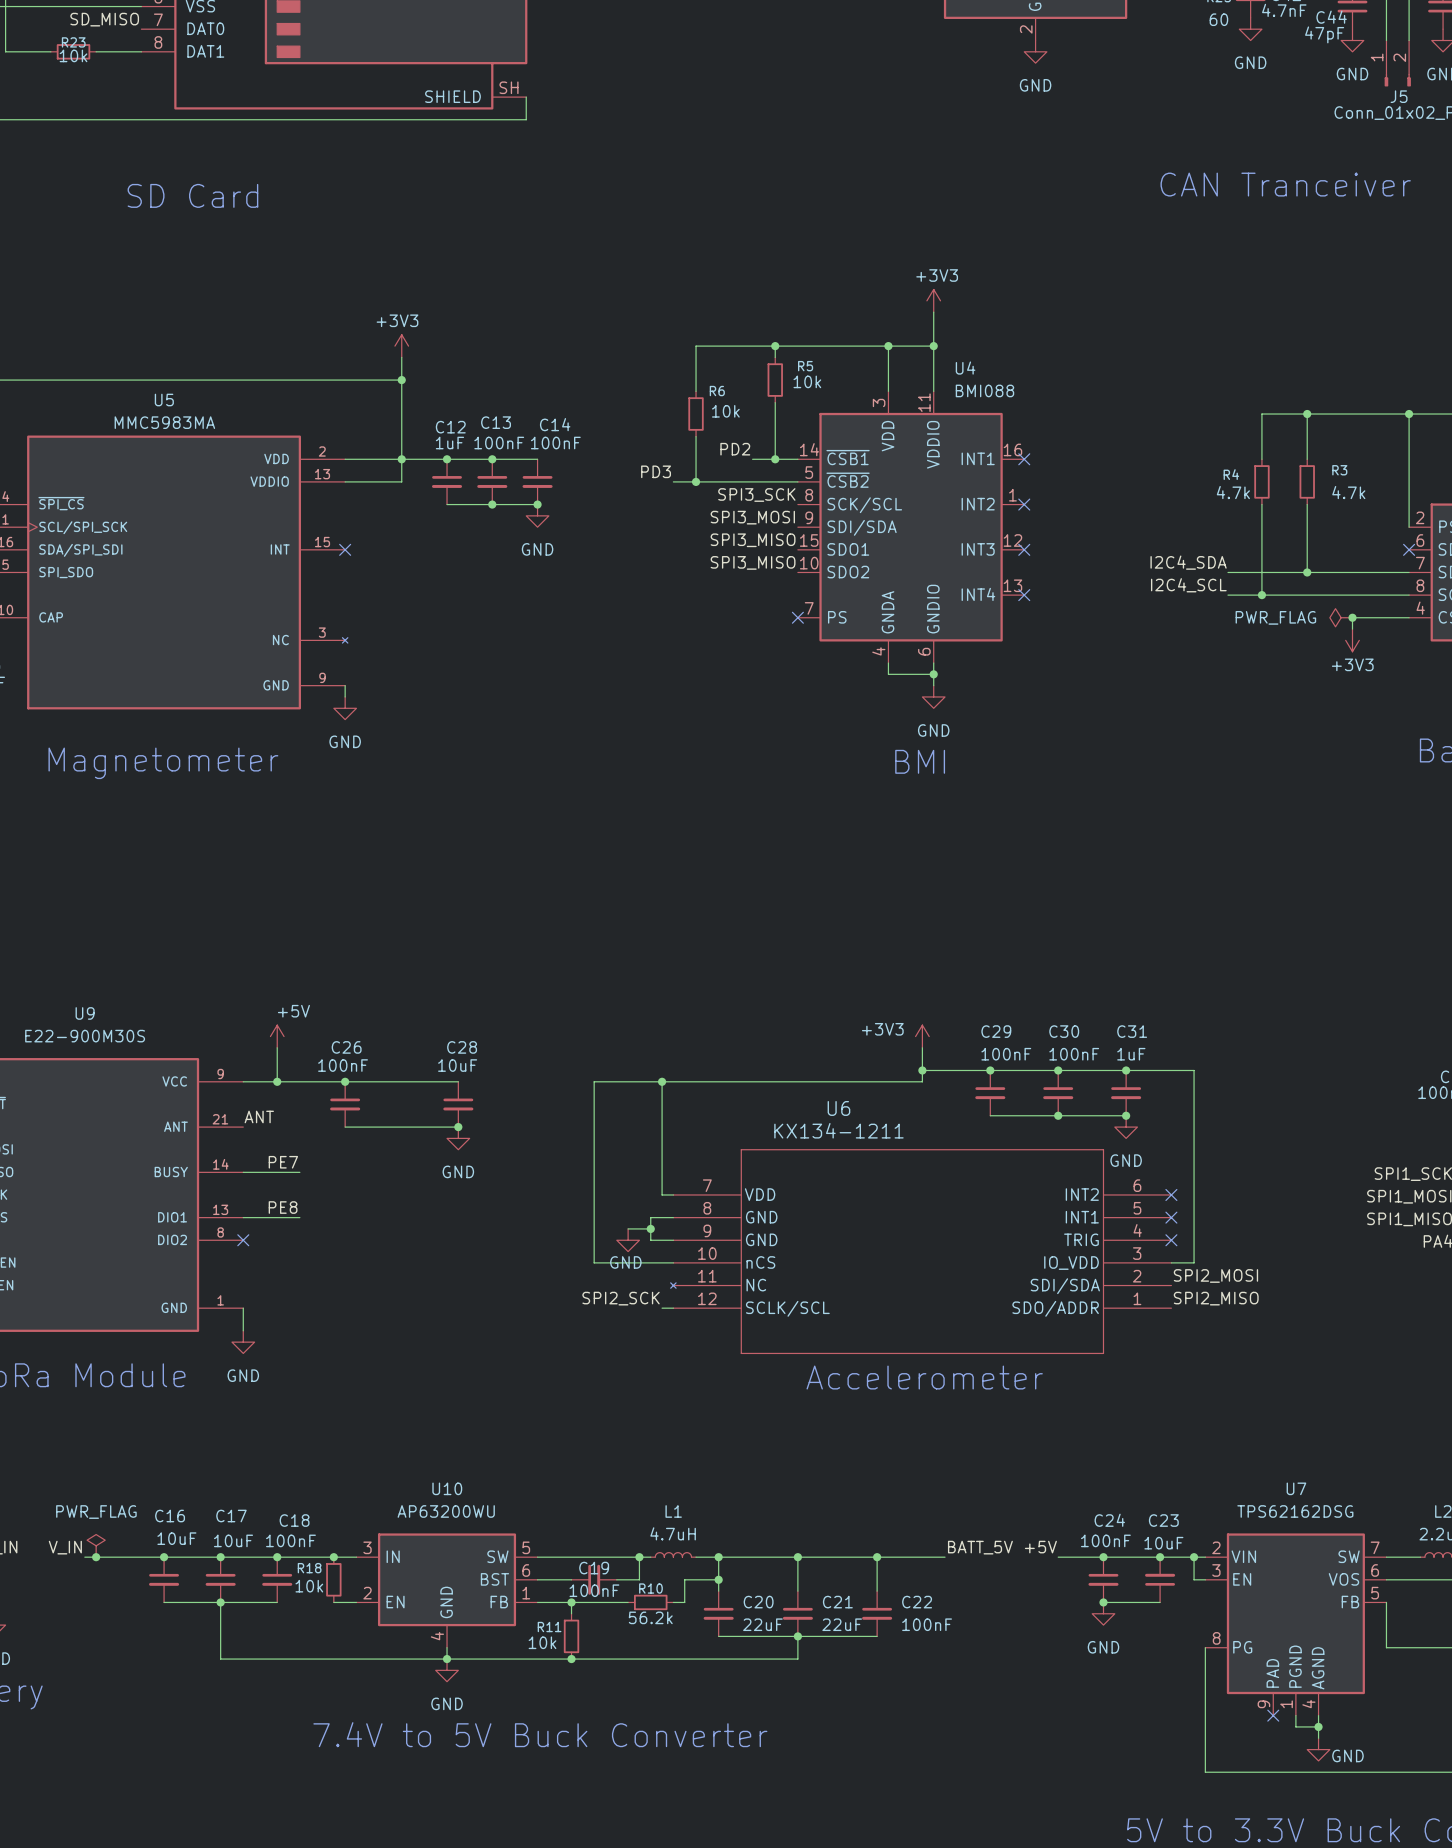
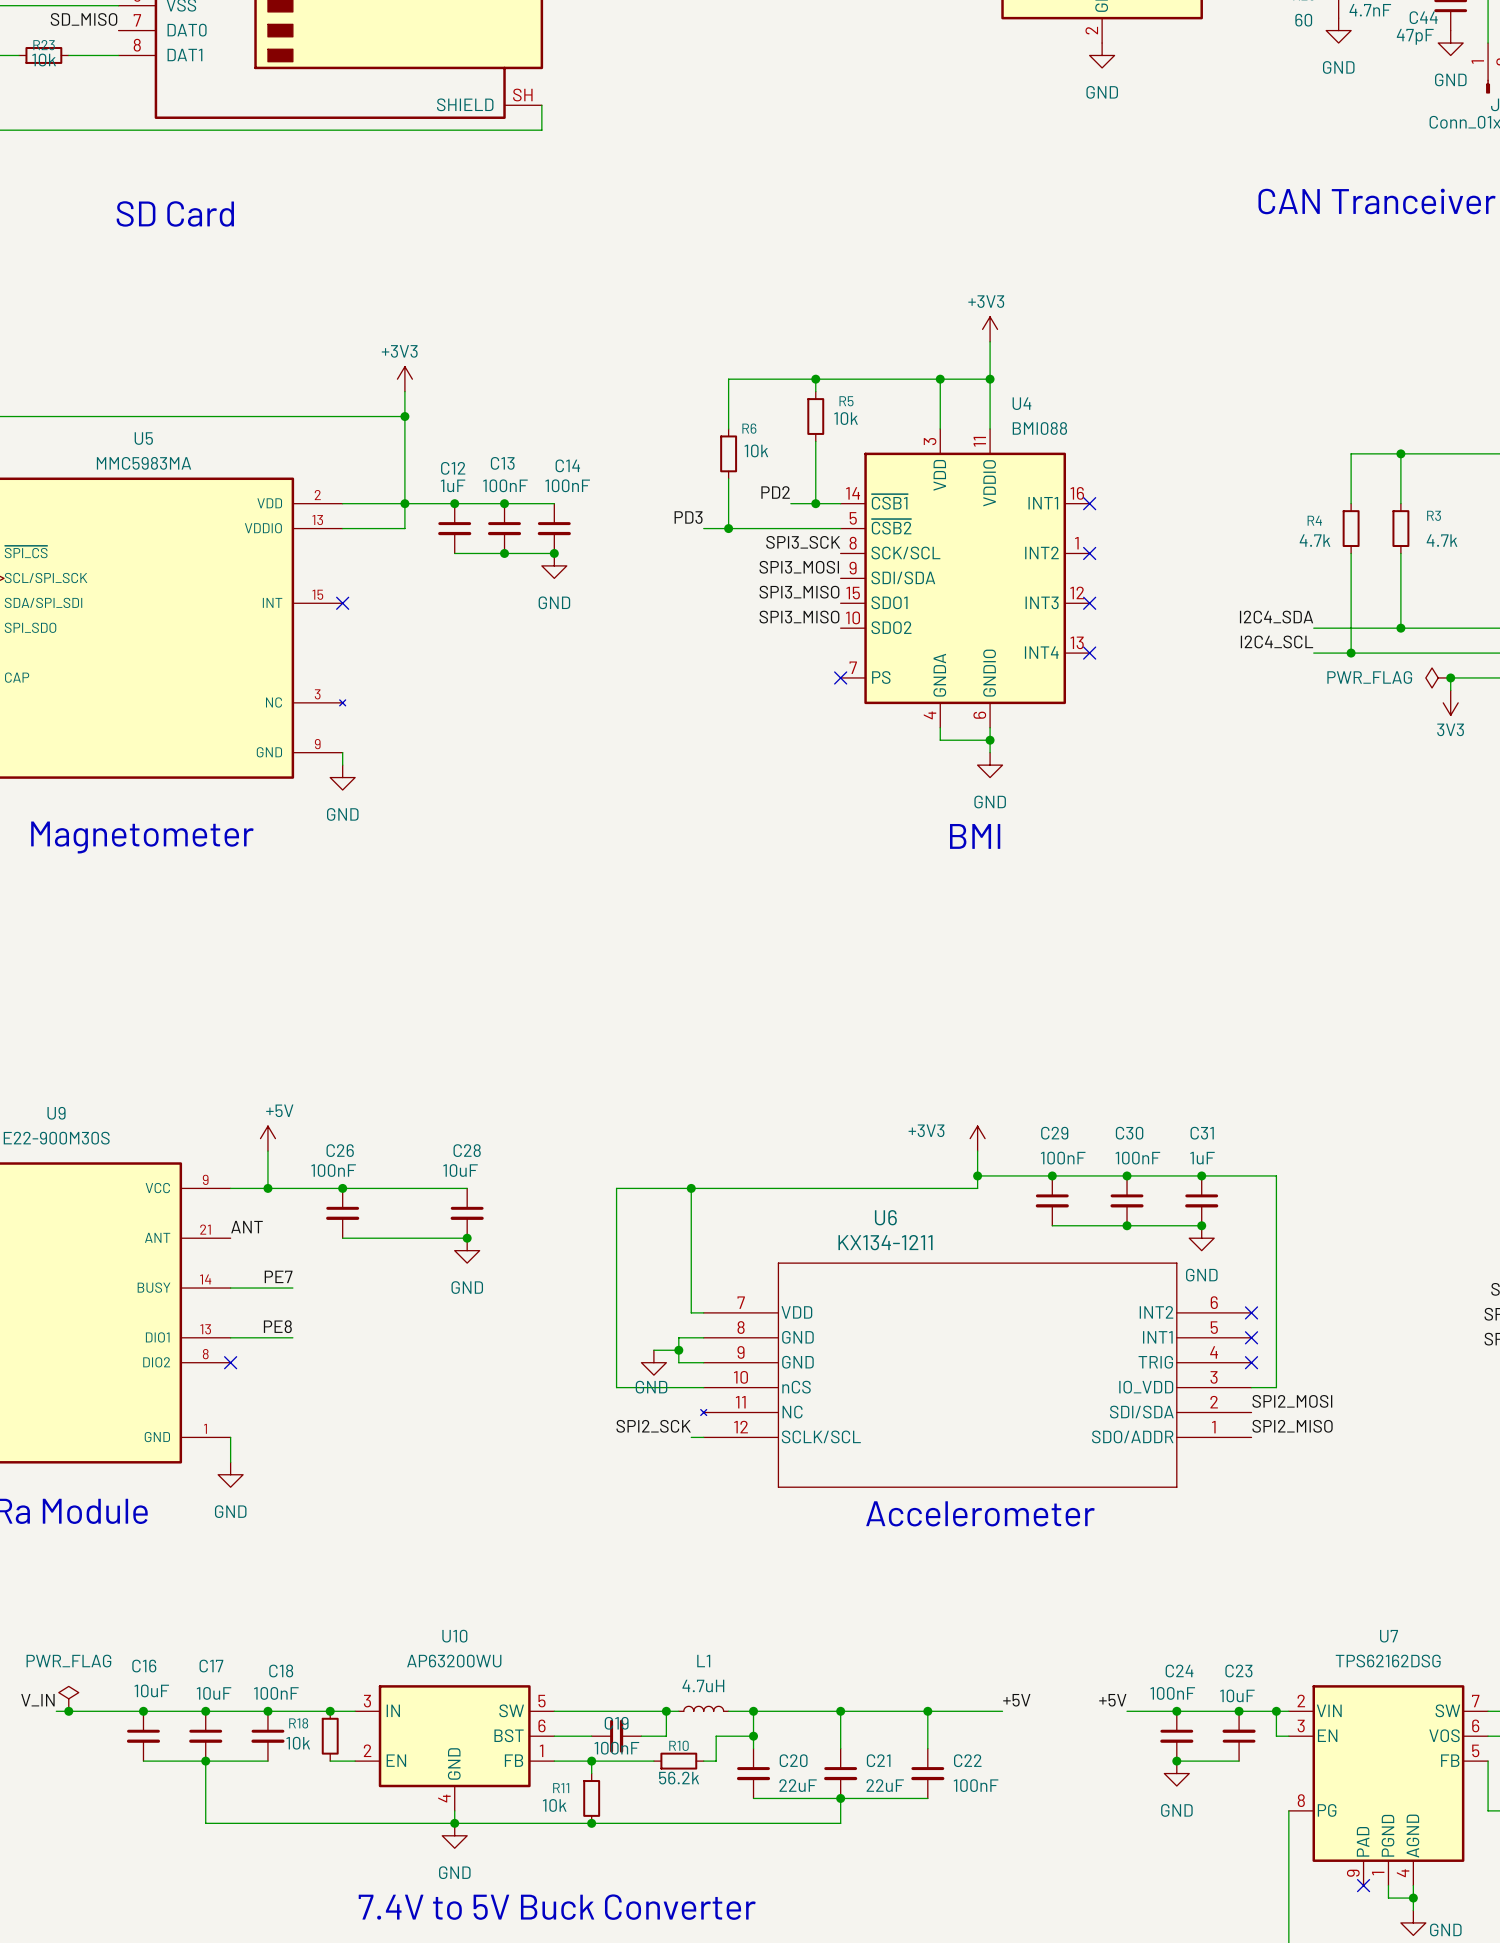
power symbol: +3V3 (1352, 640) -> 3V3 (1450, 702)
label: BATT_5V (980, 1547) -> +5V (1016, 1700)

